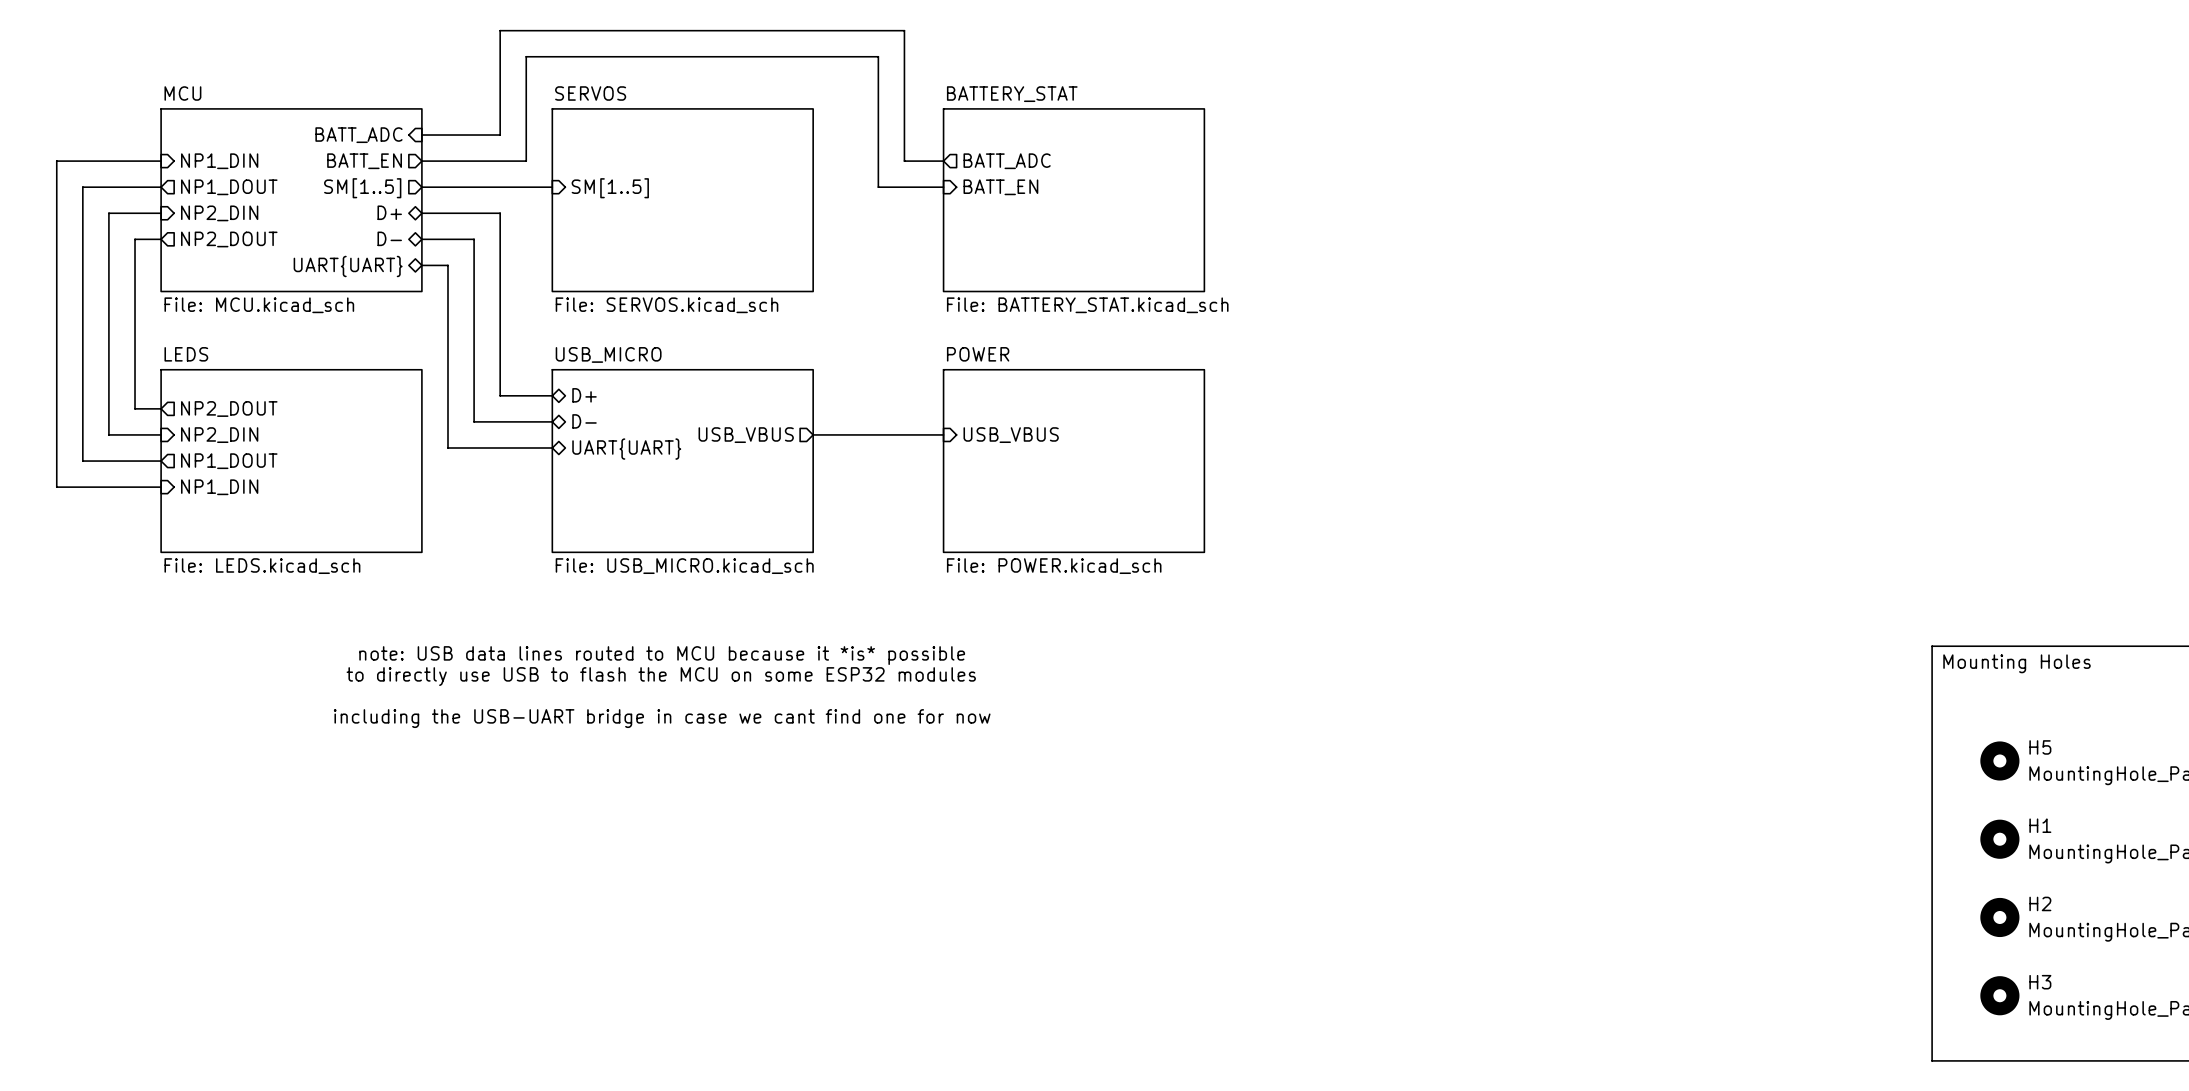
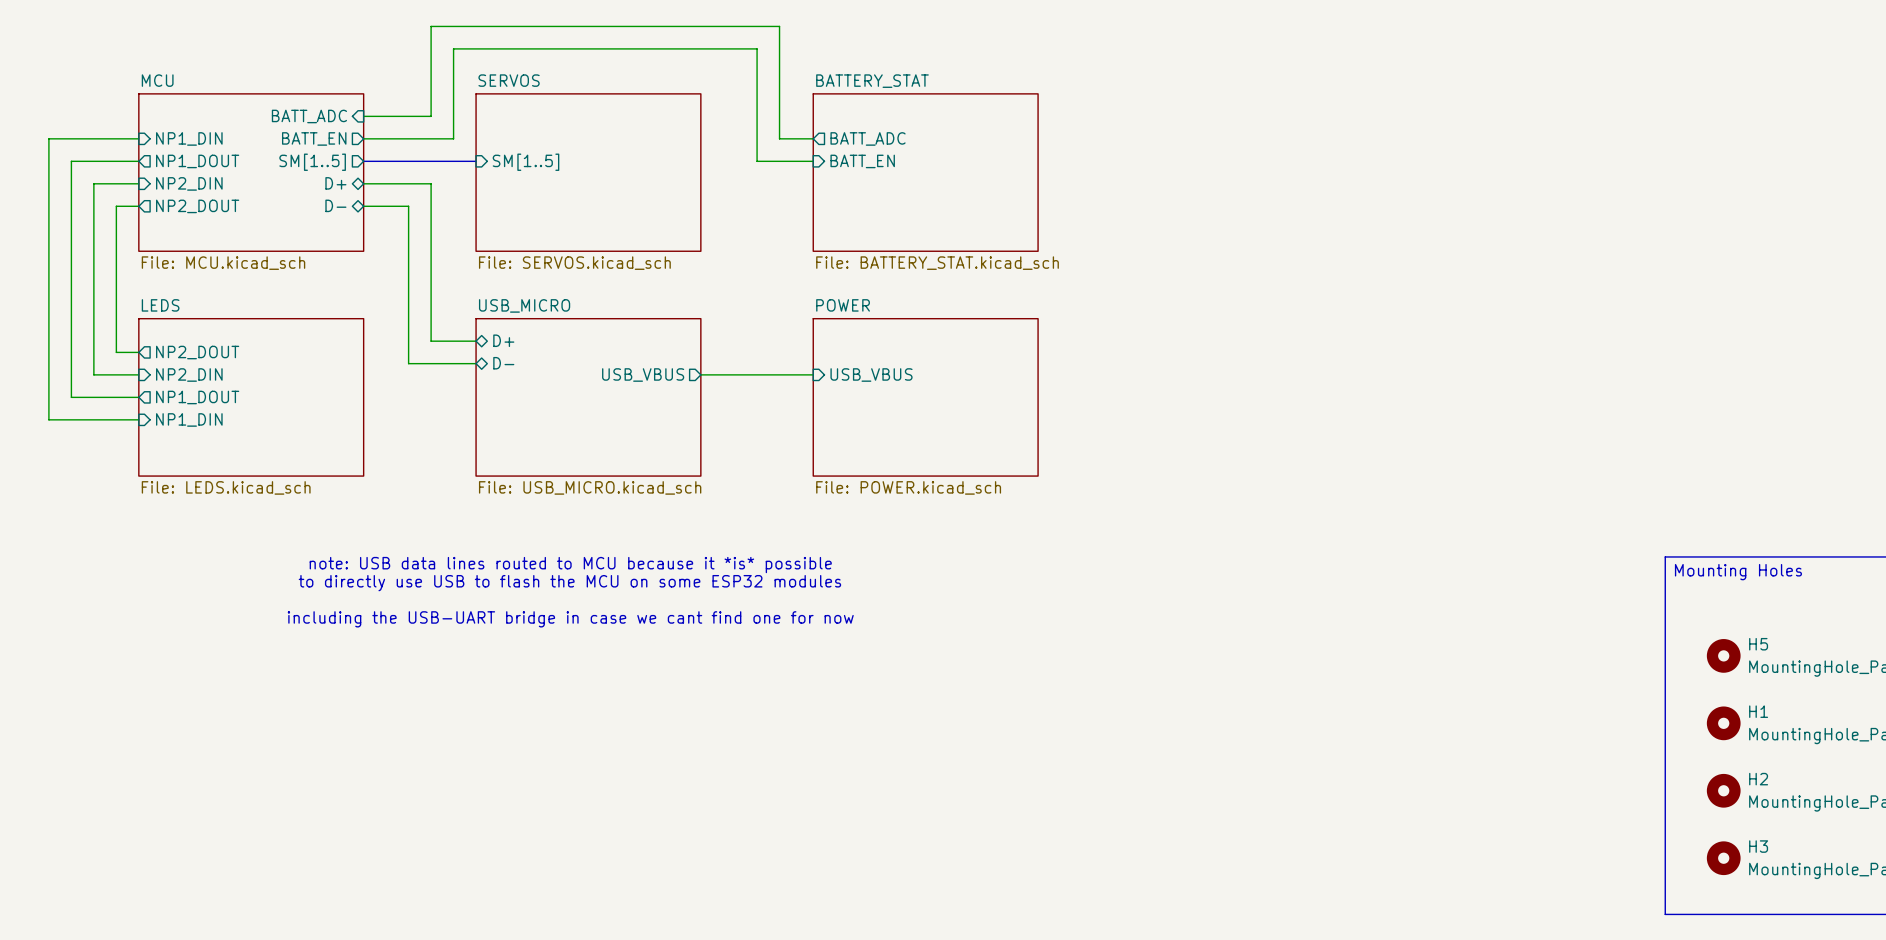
bus: (421, 265) (448, 265) (448, 448) (552, 448) -> none
sheet pin: UART{UART} (348, 266) -> none
sheet pin: UART{UART} (626, 449) -> none

